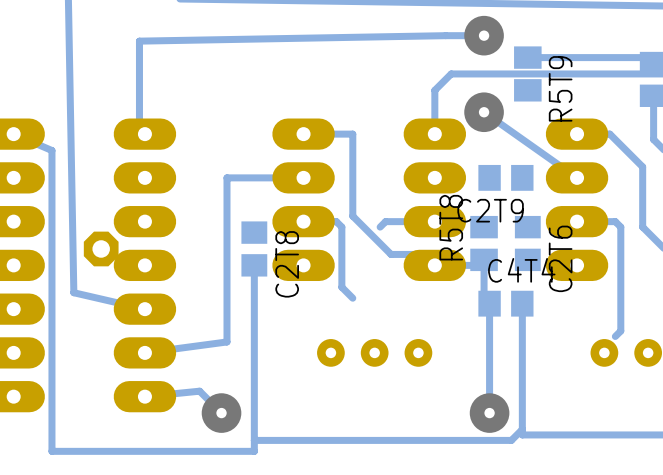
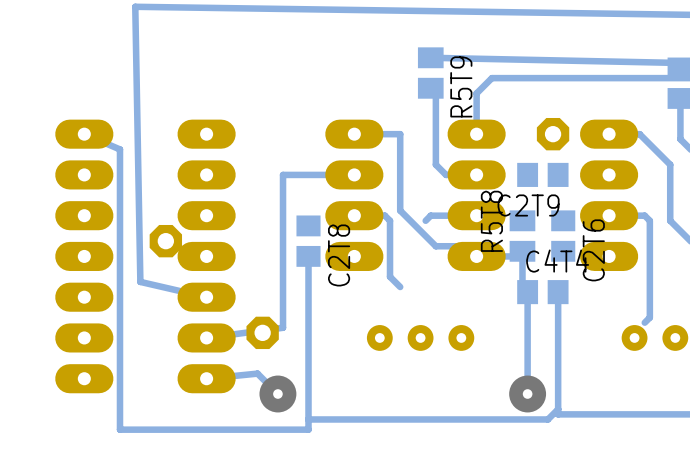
track: (484, 35) (139, 41) (139, 134) -> none
via: (484, 35) -> none
track: (648, 57) (527, 57) -> (675, 62) (430, 57)
R5T9 position: (527, 73) -> (430, 73)
track: none -> (430, 88) (435, 93) (435, 164) (446, 174) (476, 174)
track: (484, 112) (577, 177) -> none
via: (484, 112) -> none
part: none -> (553, 134)
part: none -> (262, 332)

